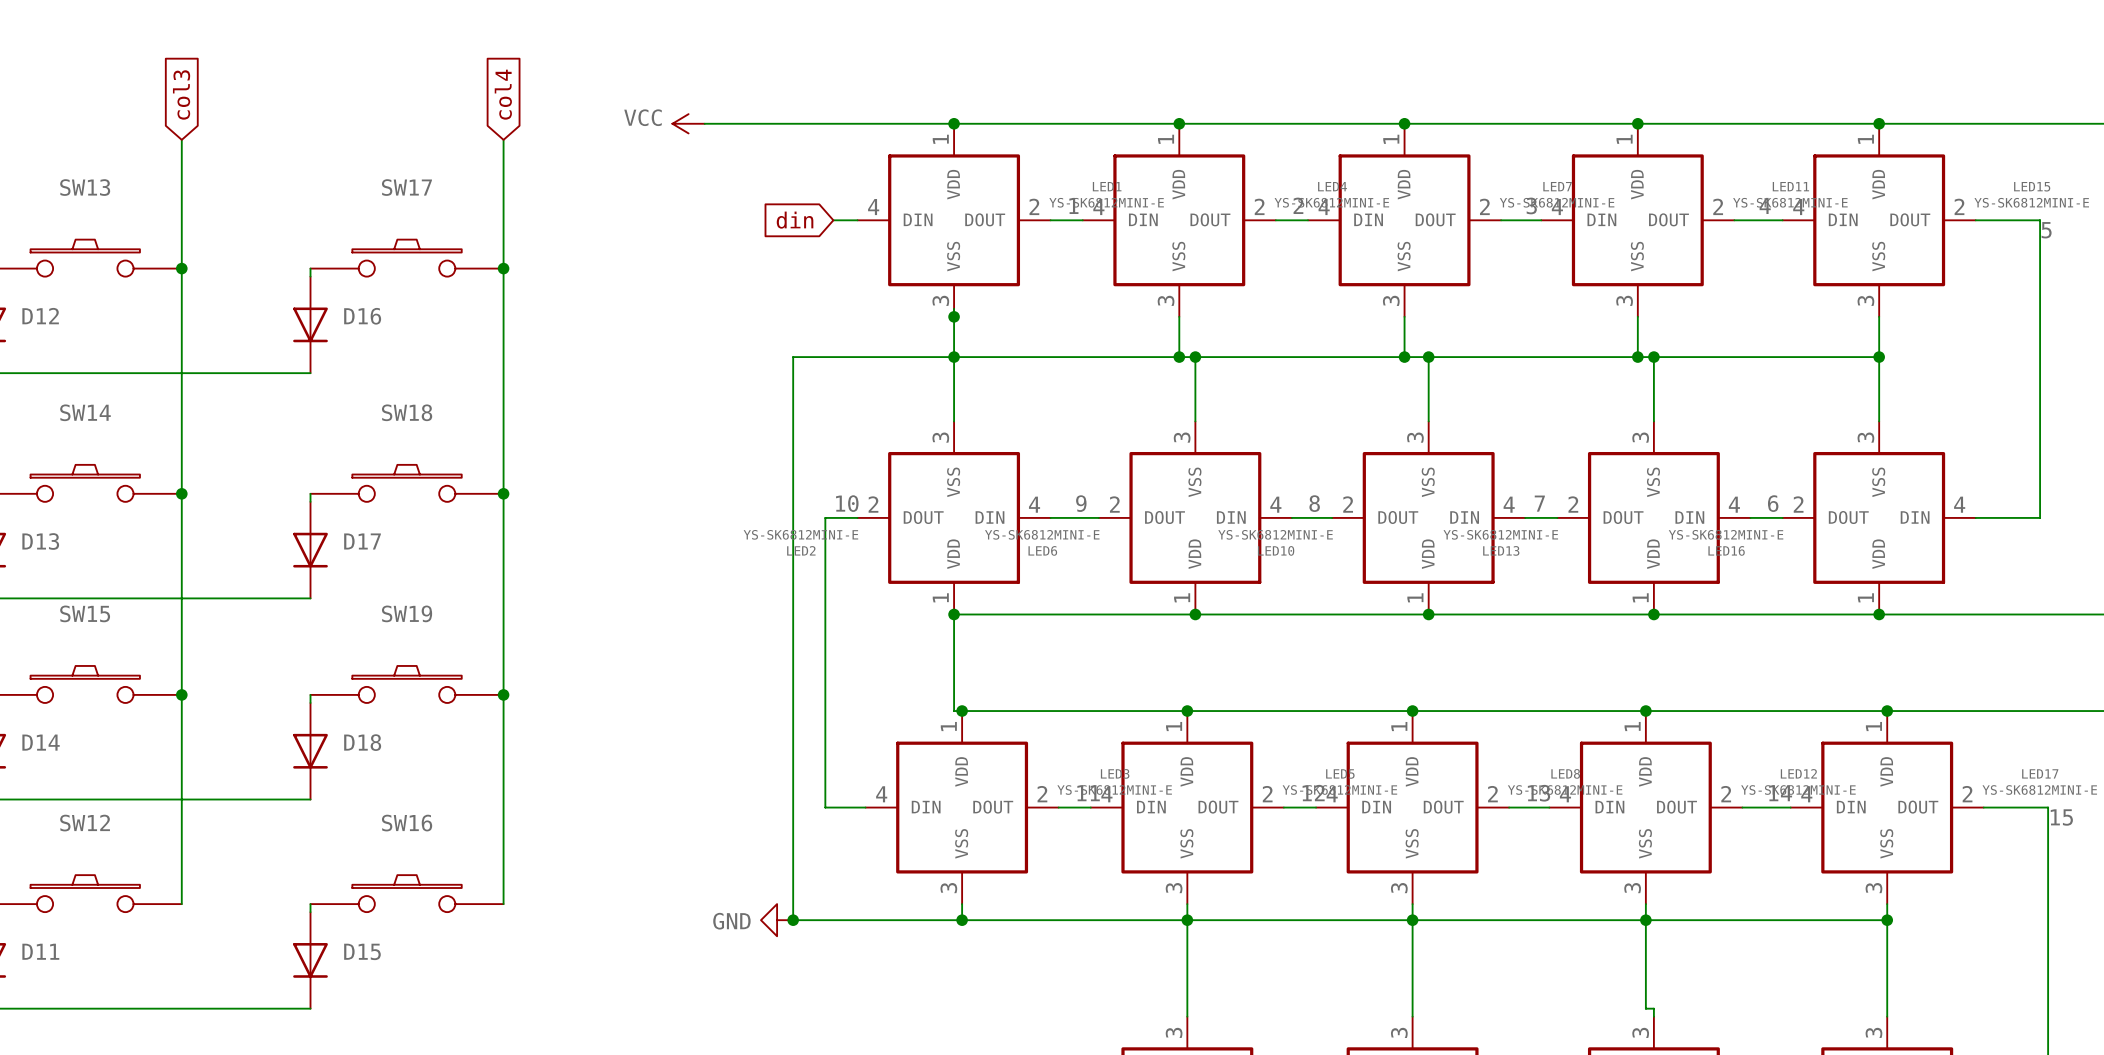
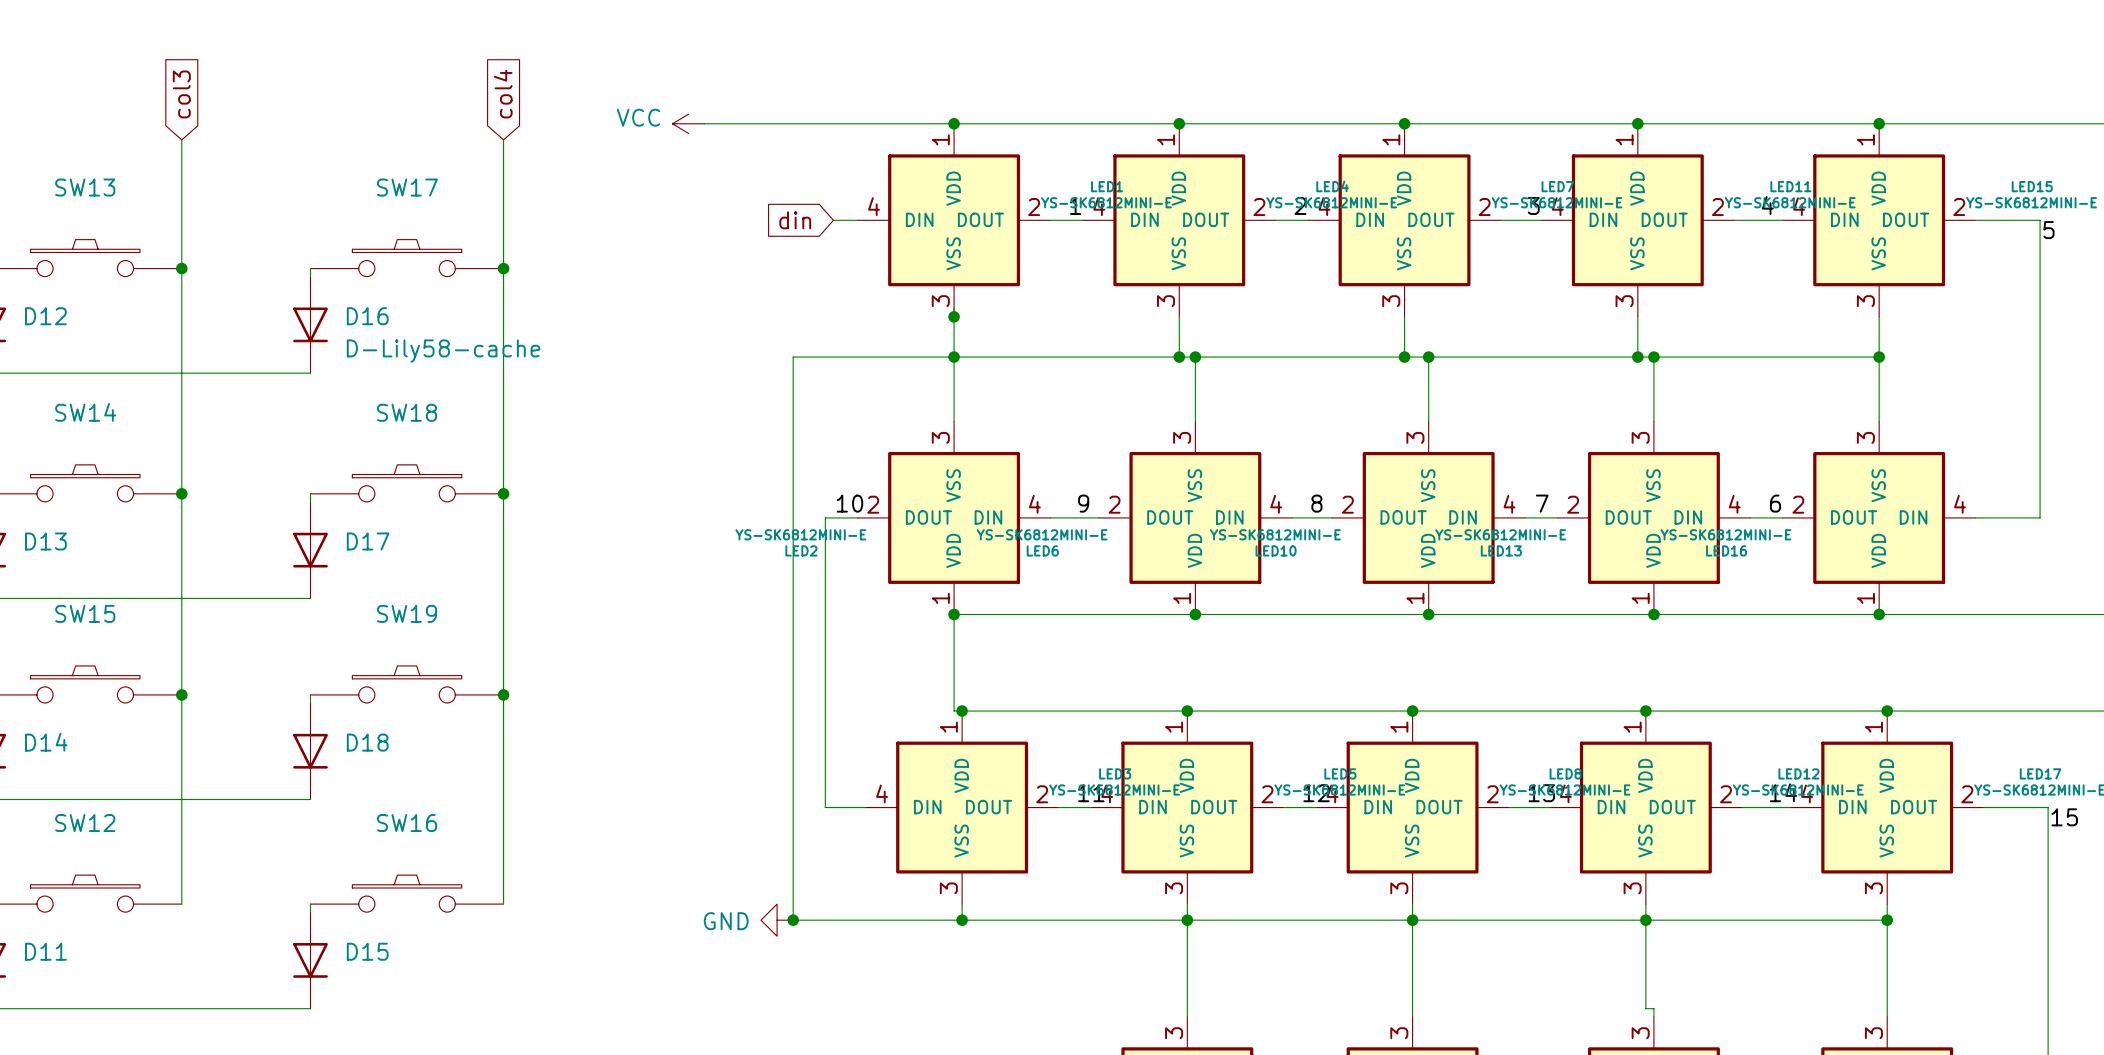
D16 value: none -> D-Lily58-cache (443, 351)

